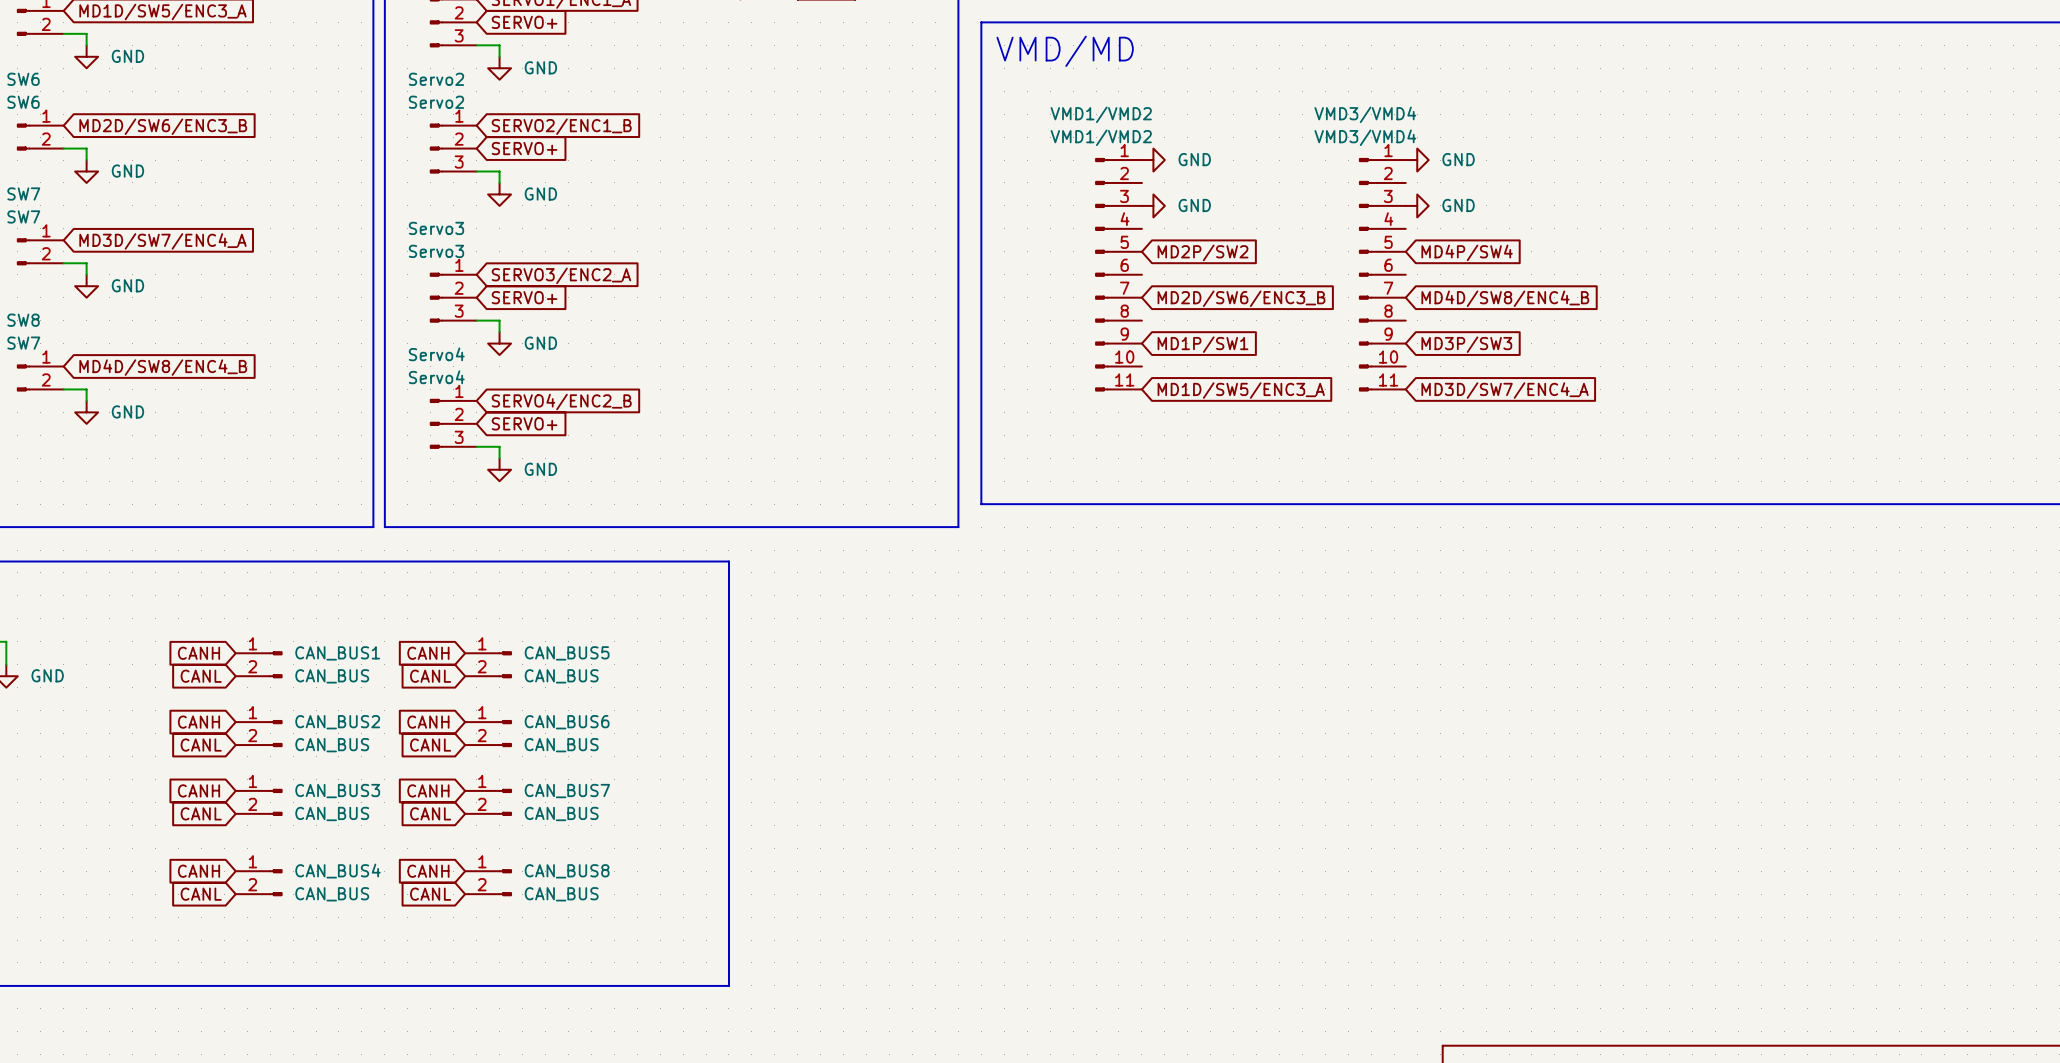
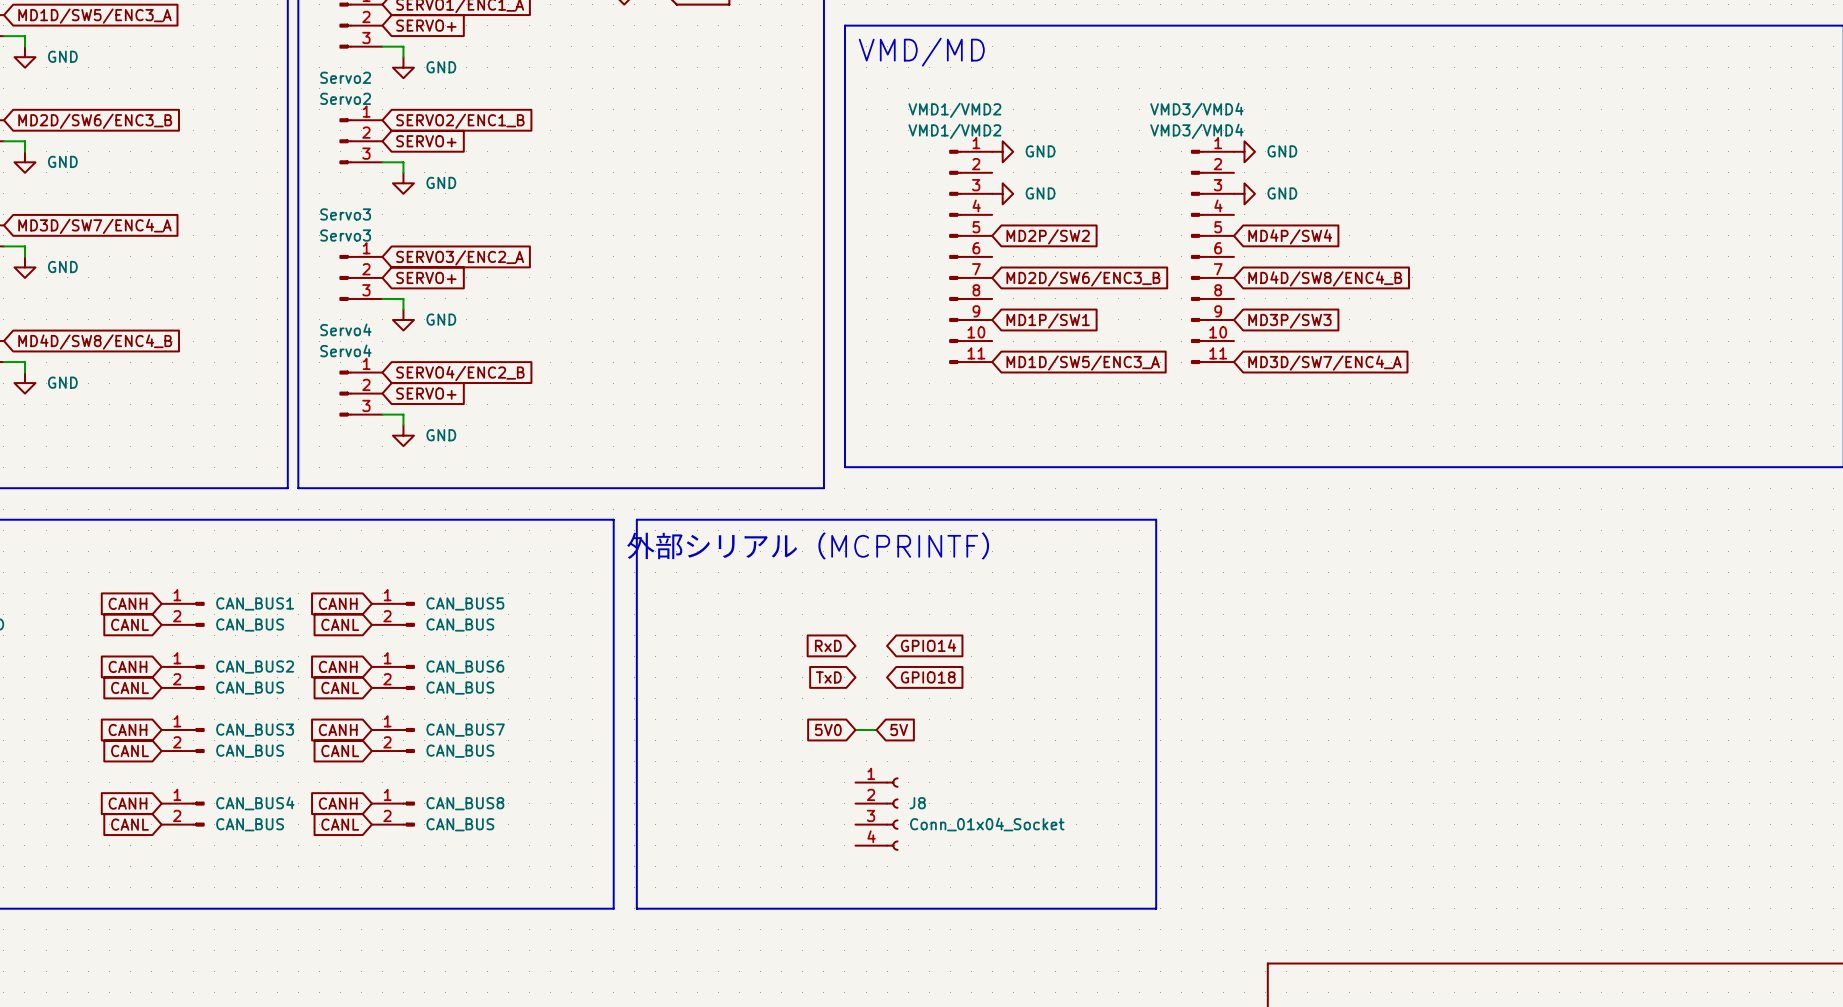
line: none -> (636, 519) (1156, 519) (1156, 908) (636, 908) (636, 519)
text: none -> 外部シリアル（MCPRINTF） (808, 545)
global label: none -> GPIO14 (928, 645)
global label: none -> RxD (828, 645)
global label: none -> TxD (828, 677)
global label: none -> GPIO18 (928, 677)
global label: none -> 5V0 (828, 730)
wire: none -> (855, 730) (876, 730)
global label: none -> 5V (899, 730)
J8: none -> Conn_01x04_Socket (876, 814)

